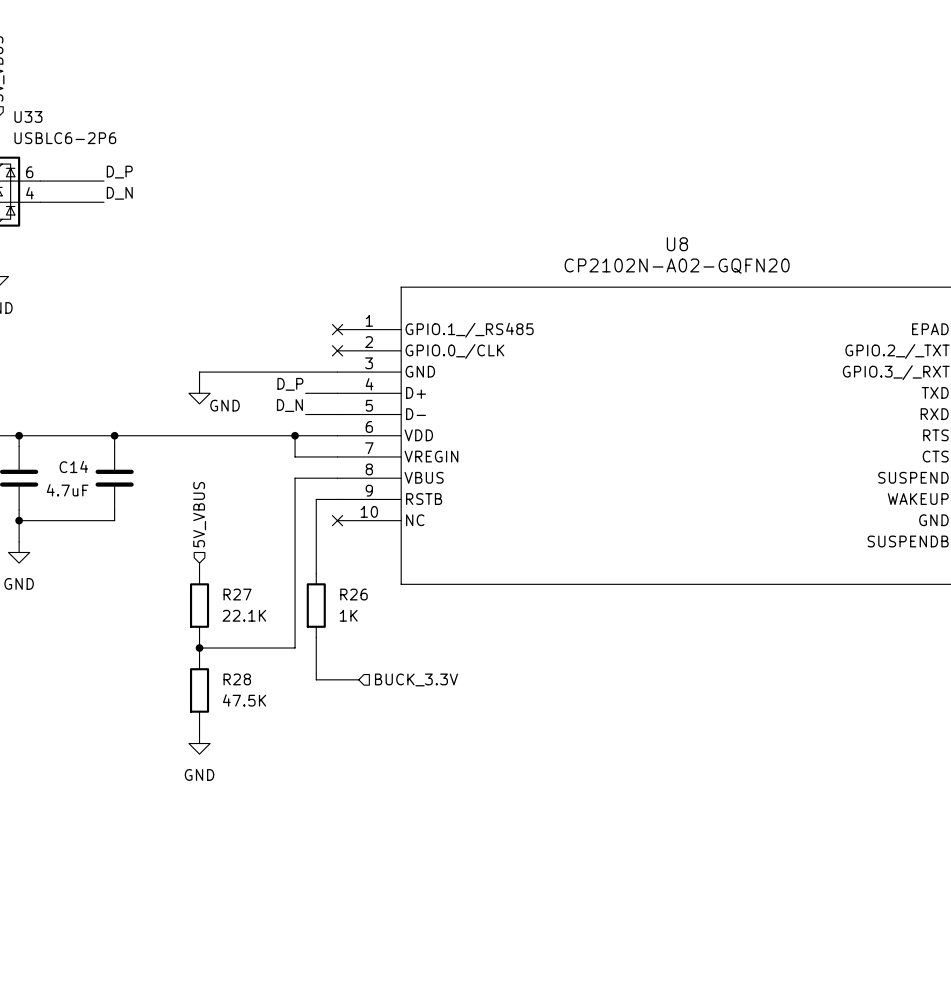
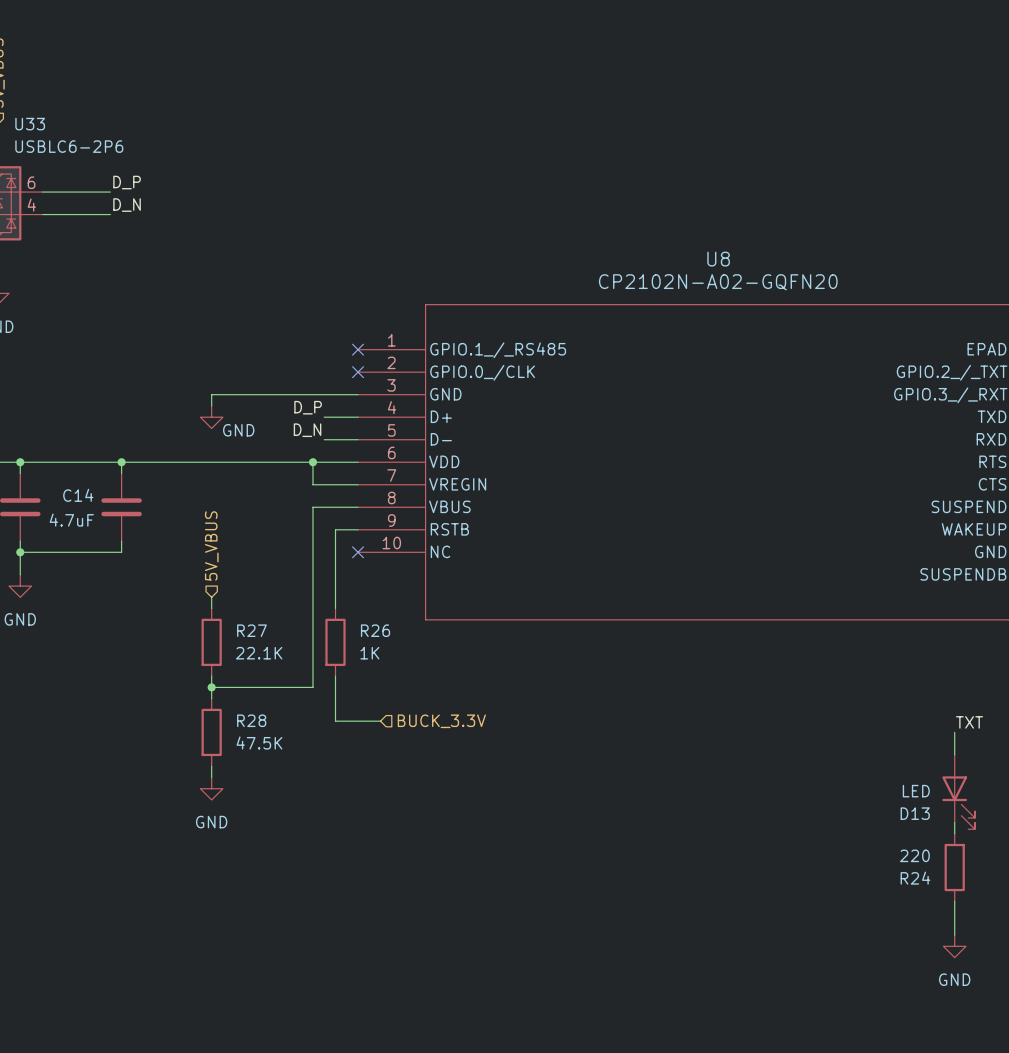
label: none -> TXT (969, 722)
wire: none -> (954, 732) (954, 754)
D13: none -> LED (958, 792)
wire: none -> (954, 822) (954, 833)
R24: none -> 220 (954, 867)
wire: none -> (954, 901) (954, 935)
power symbol: none -> GND (954, 946)

